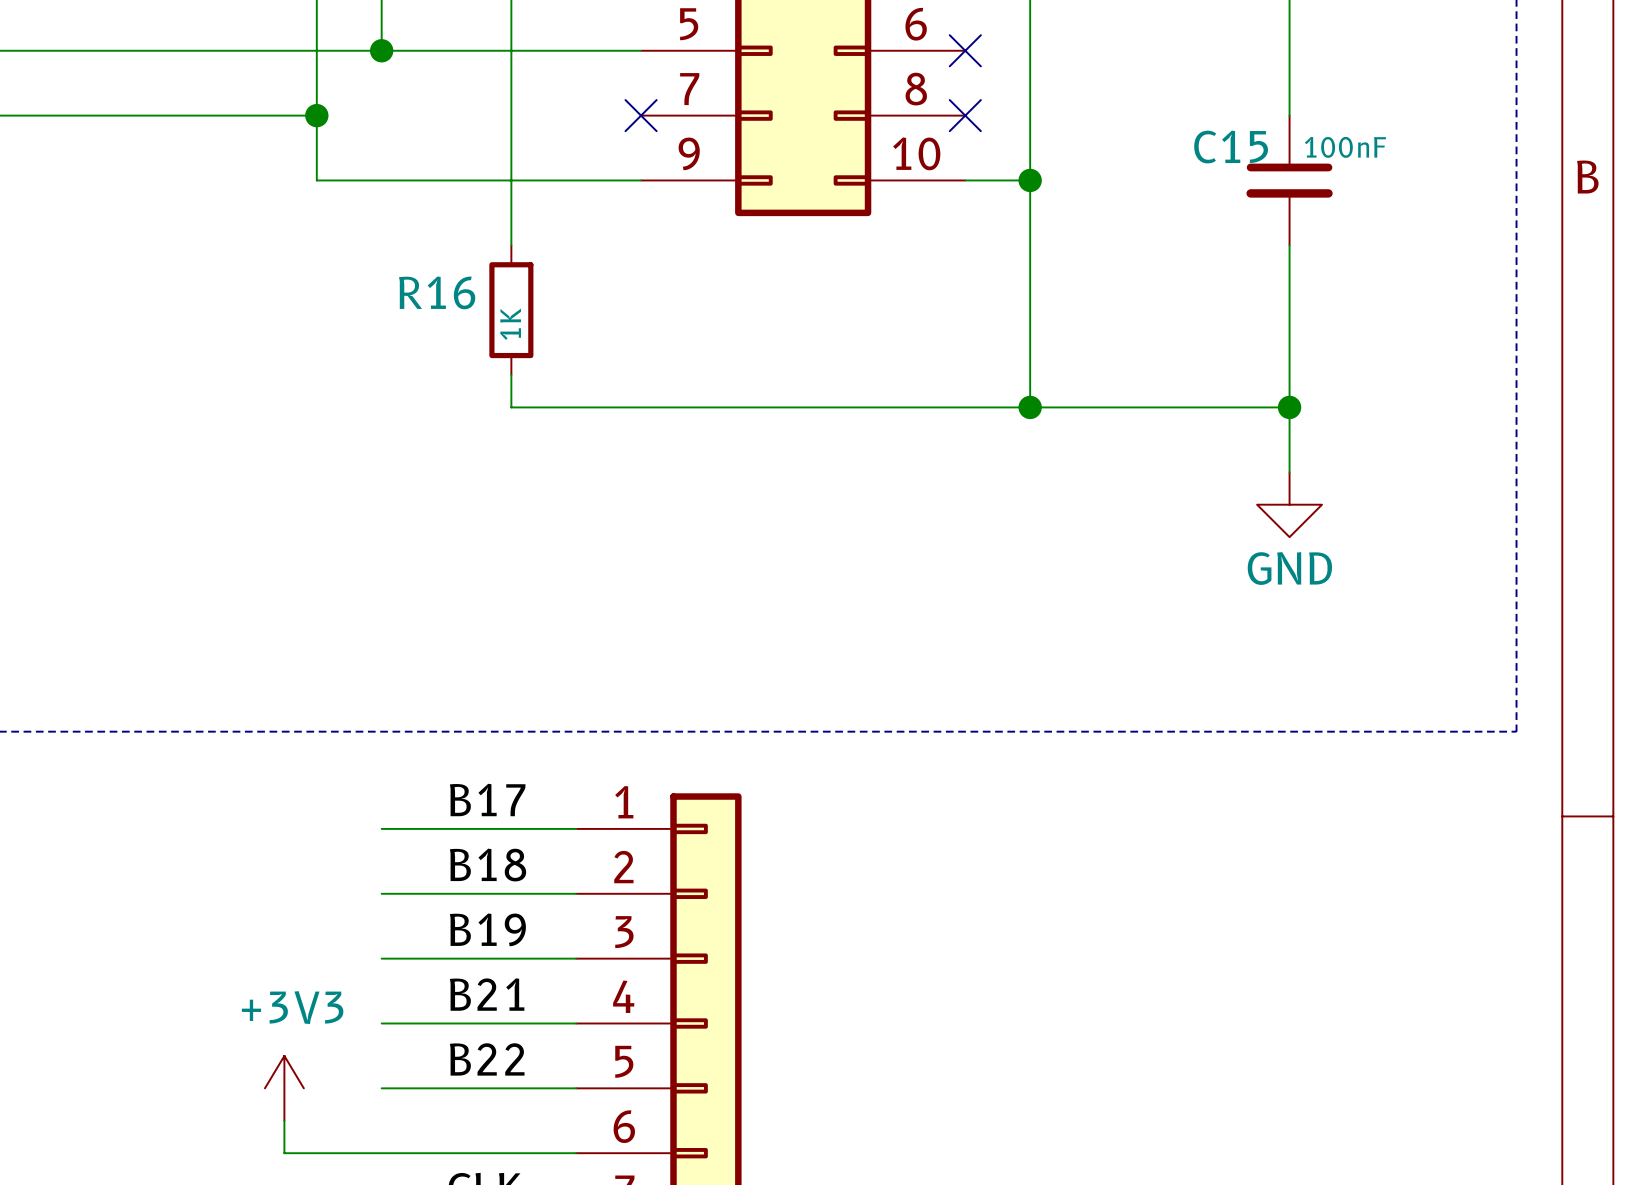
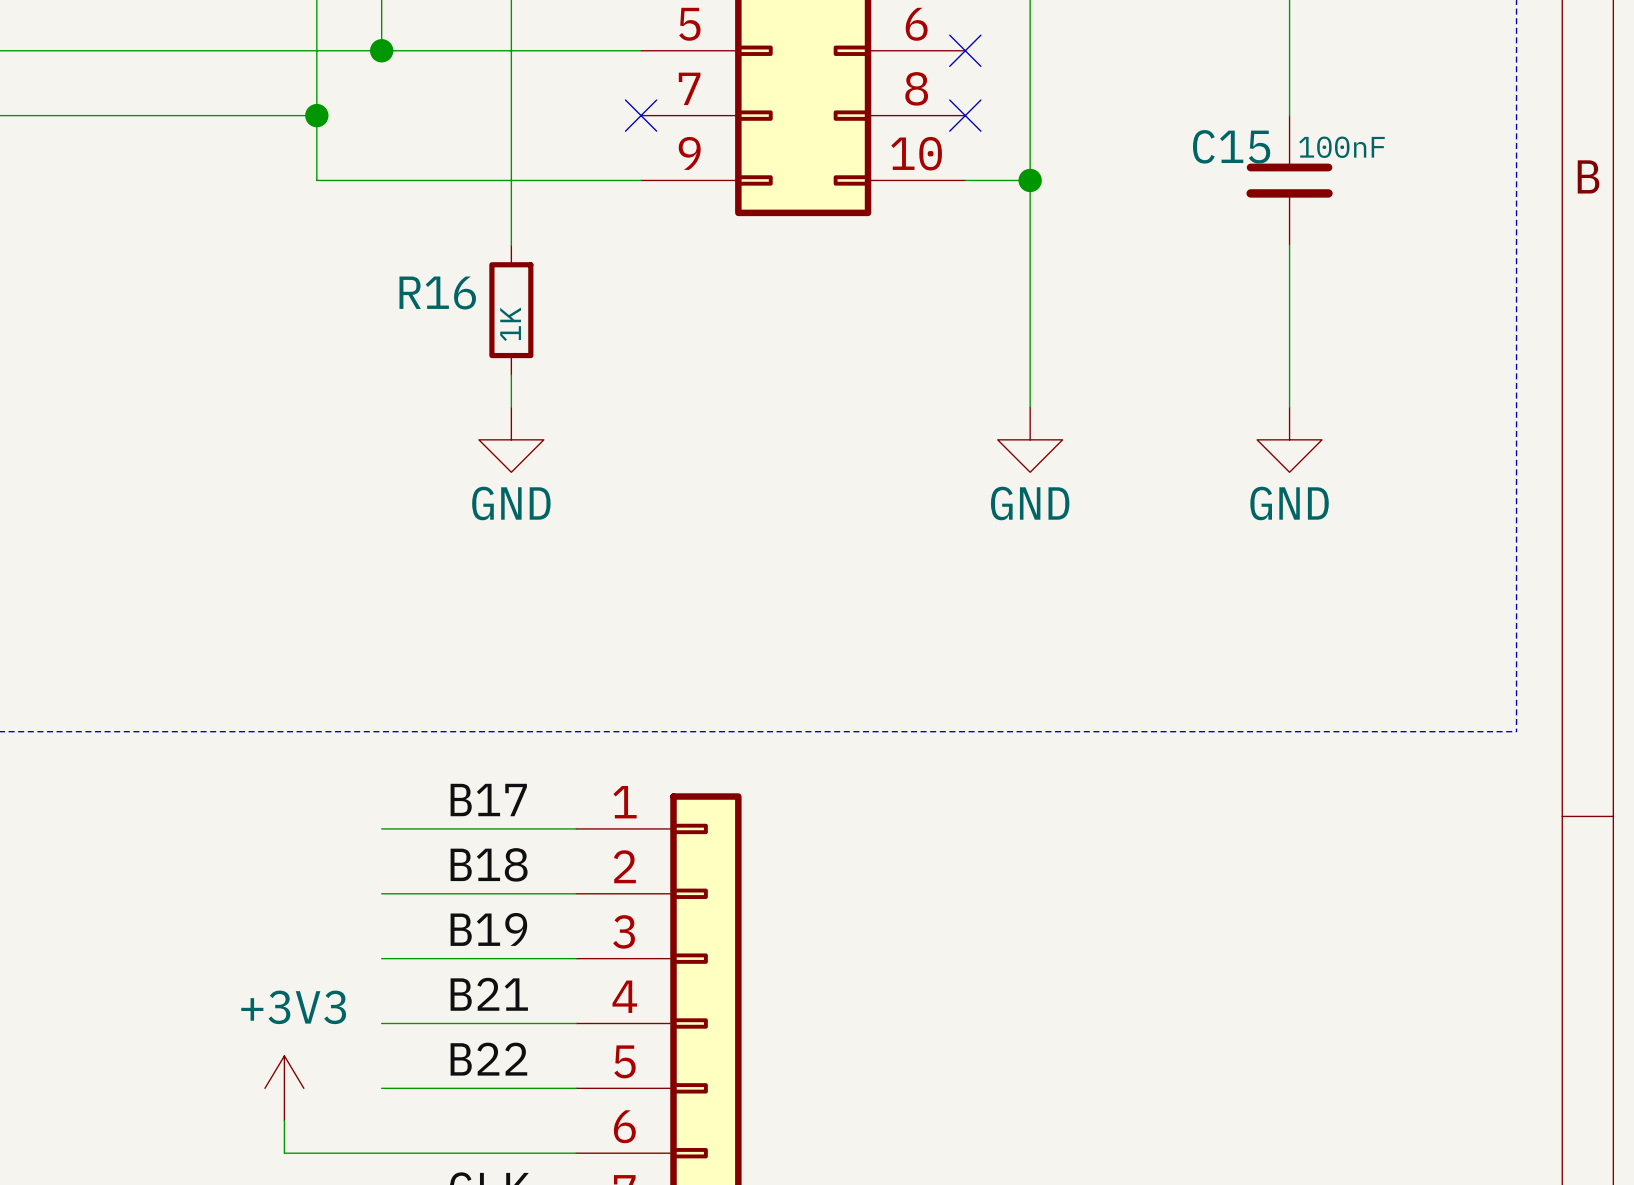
wire: (511, 407) (1289, 407) (1289, 472) -> none
junction: (1030, 407) -> none
junction: (1289, 407) -> none
power symbol: none -> GND (511, 439)
power symbol: none -> GND (1030, 439)
power symbol position: GND (1289, 504) -> GND (1289, 439)

